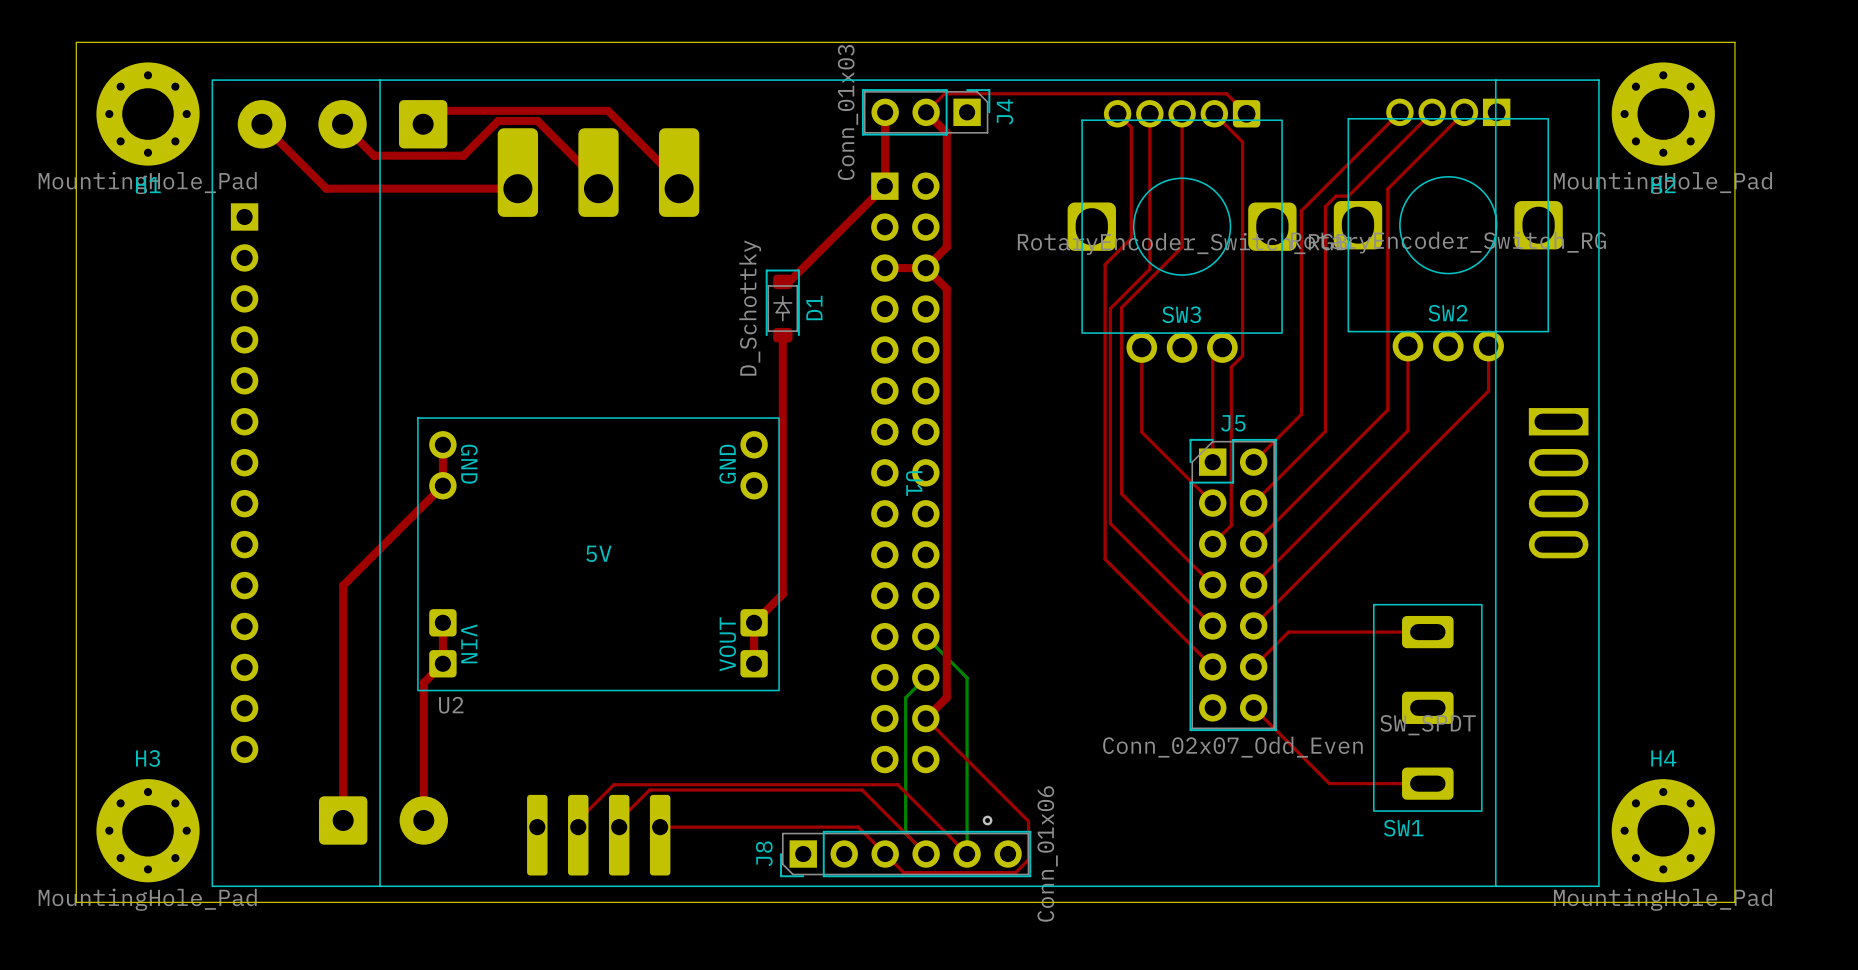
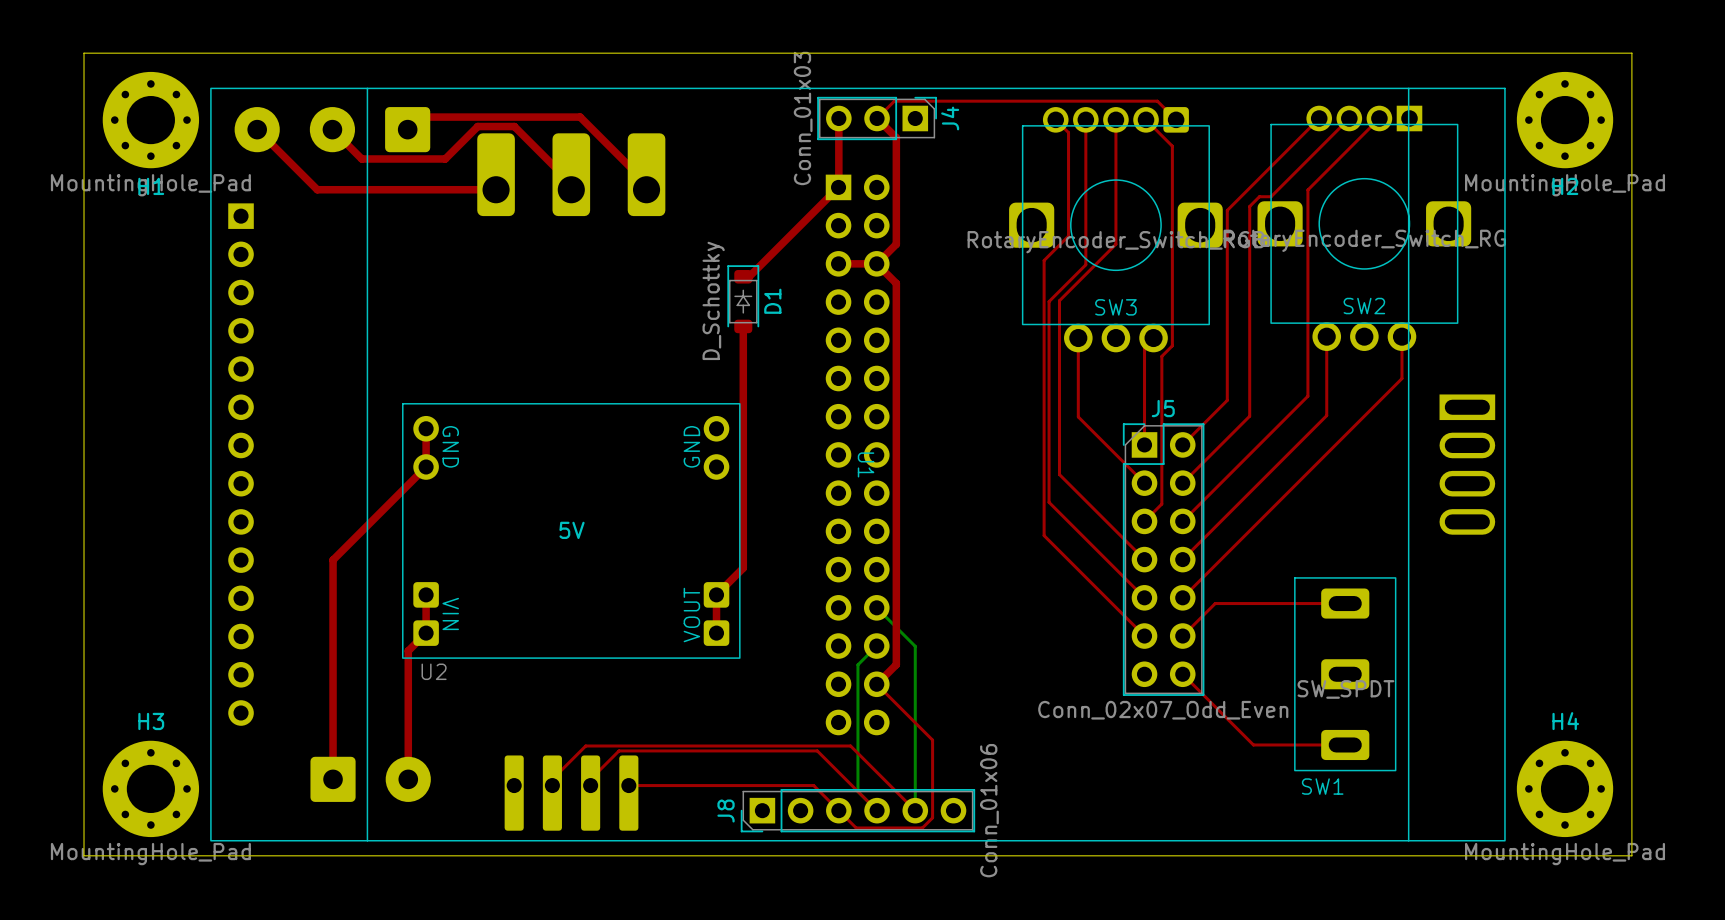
top track: (985, 778) (1028, 821) (1028, 859) (1015, 872) (974, 872) -> (932, 740) (932, 817) (922, 827)
via: (987, 820) -> none

